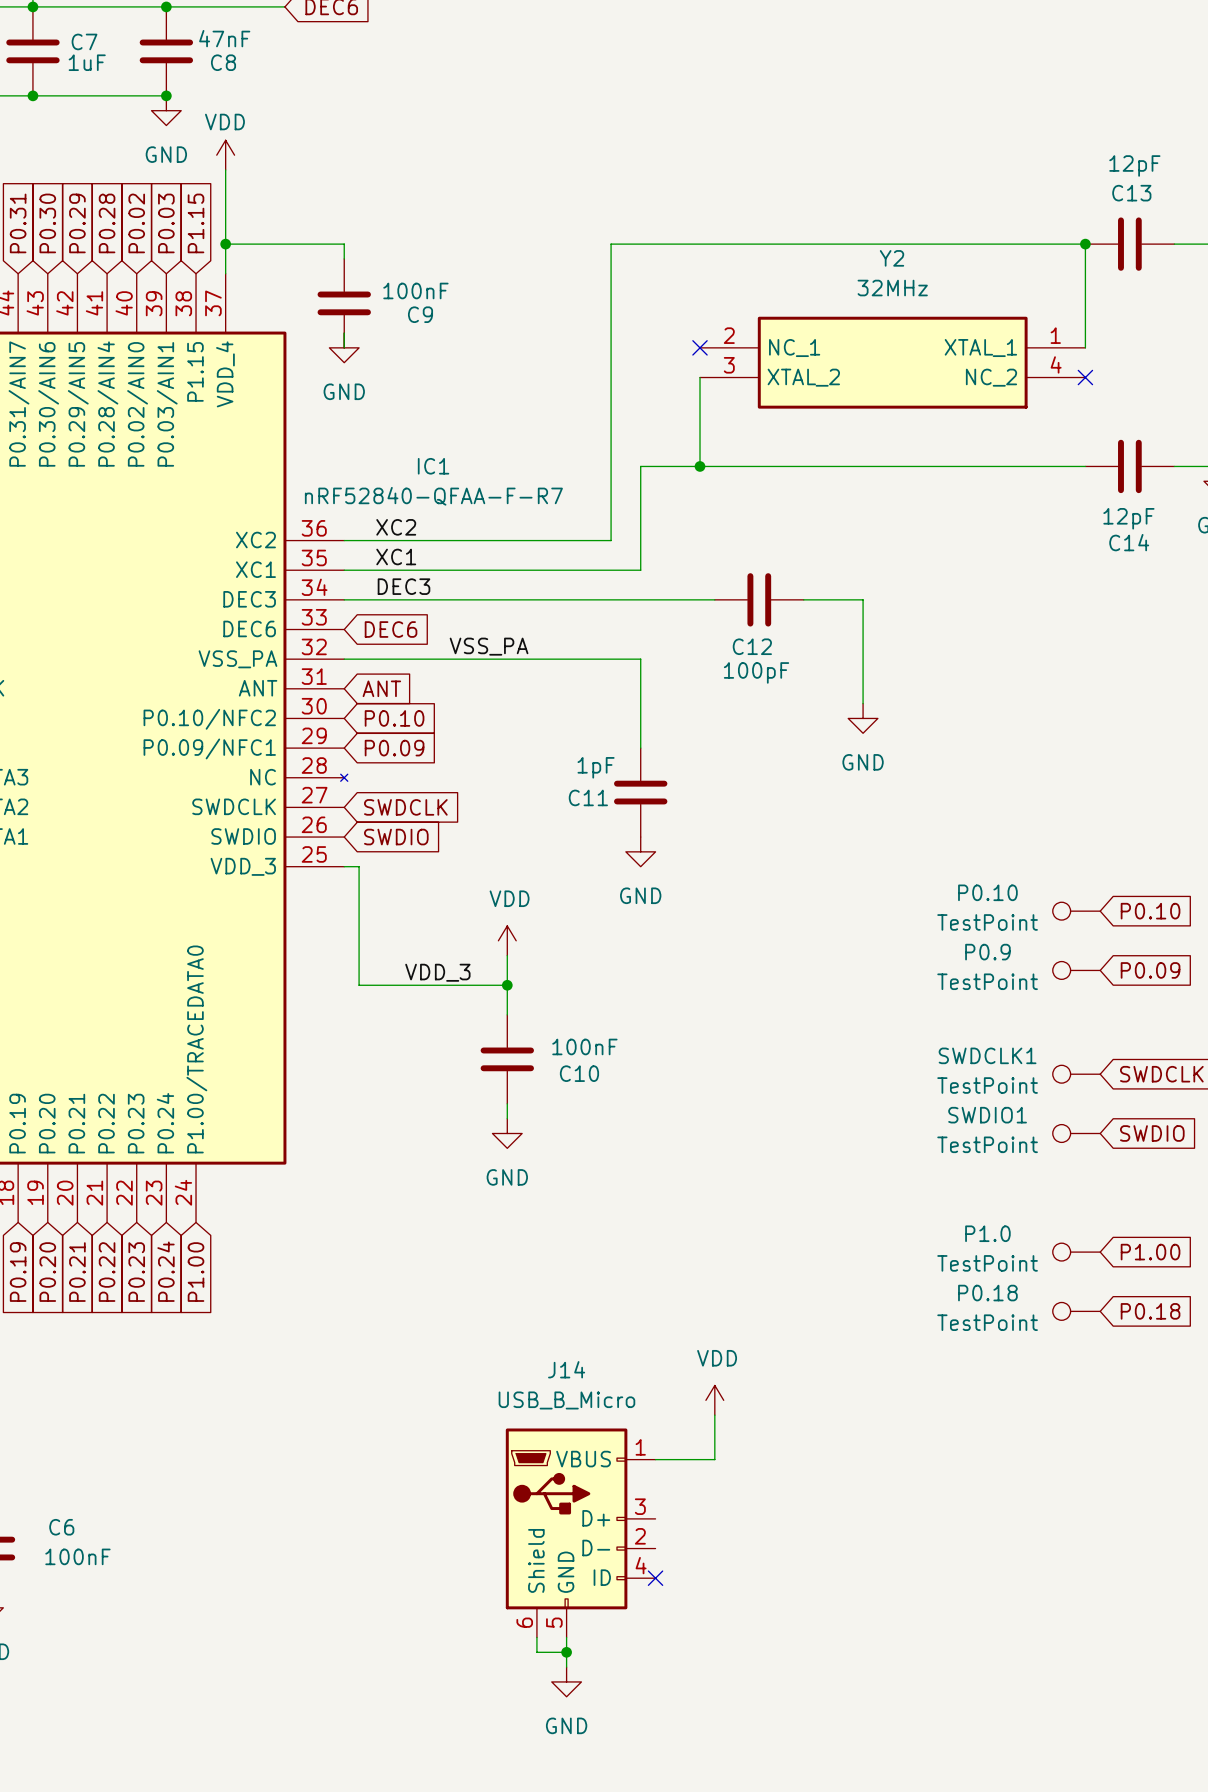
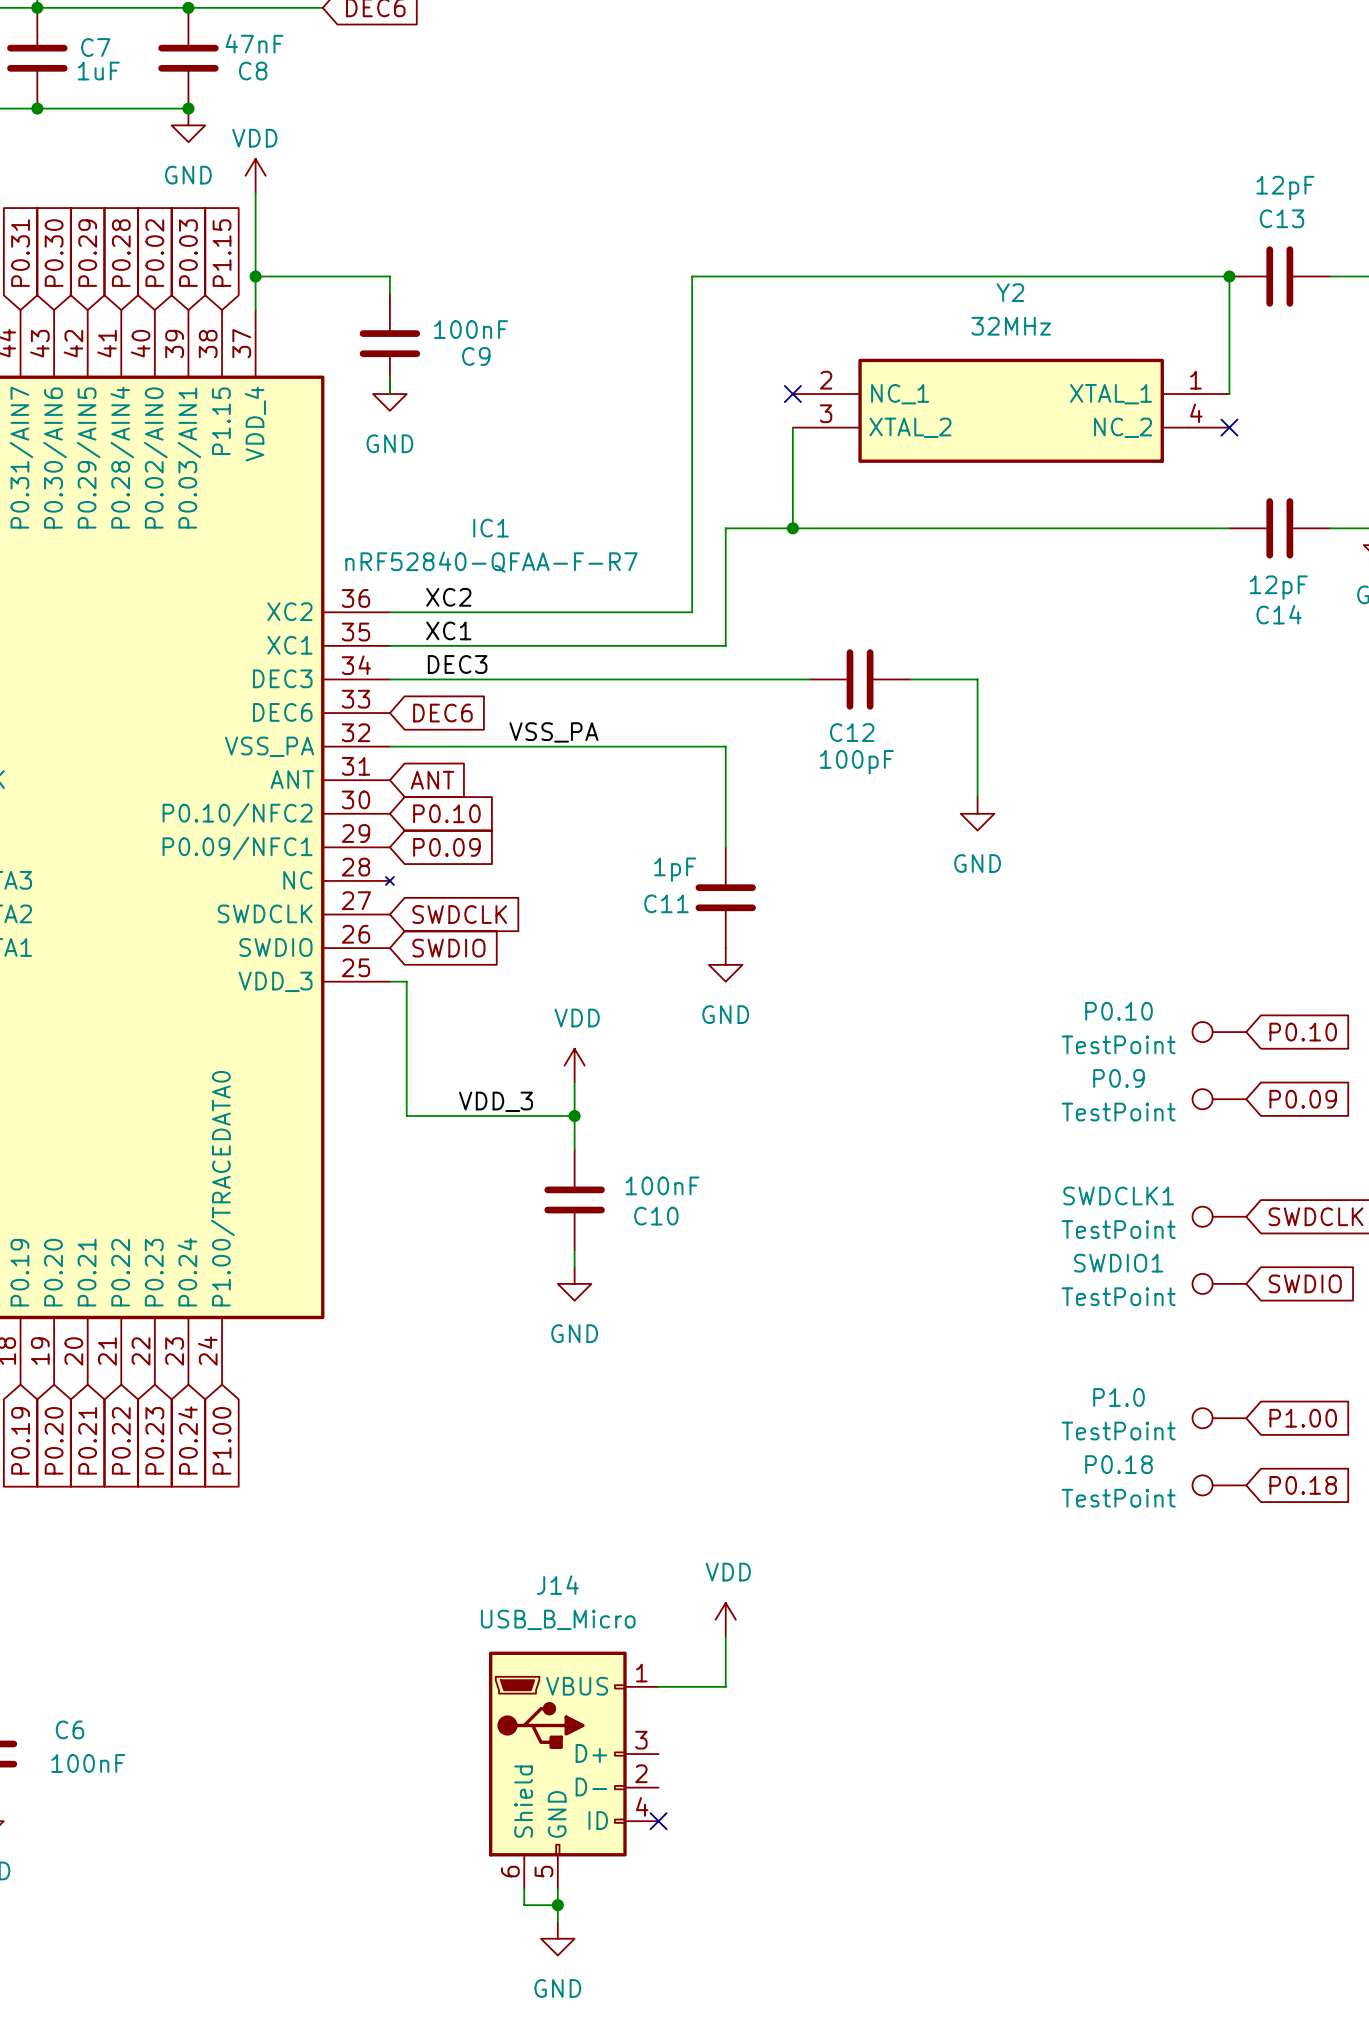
power symbol position: VDD (714, 1400) -> VDD (725, 1619)
wire: (714, 1415) (714, 1459) (655, 1459) -> (725, 1636) (725, 1686) (658, 1686)
J14 position: (580, 1532) -> (573, 1769)
no-connect mark: (655, 1578) -> none
no-connect mark: none -> (658, 1821)
wire: (536, 1637) (536, 1652) (566, 1652) -> (524, 1888) (524, 1905) (557, 1905)
wire: (566, 1637) (566, 1667) -> (557, 1888) (557, 1921)
junction: (566, 1652) -> none
junction: none -> (557, 1905)
power symbol position: GND (566, 1681) -> GND (557, 1938)

